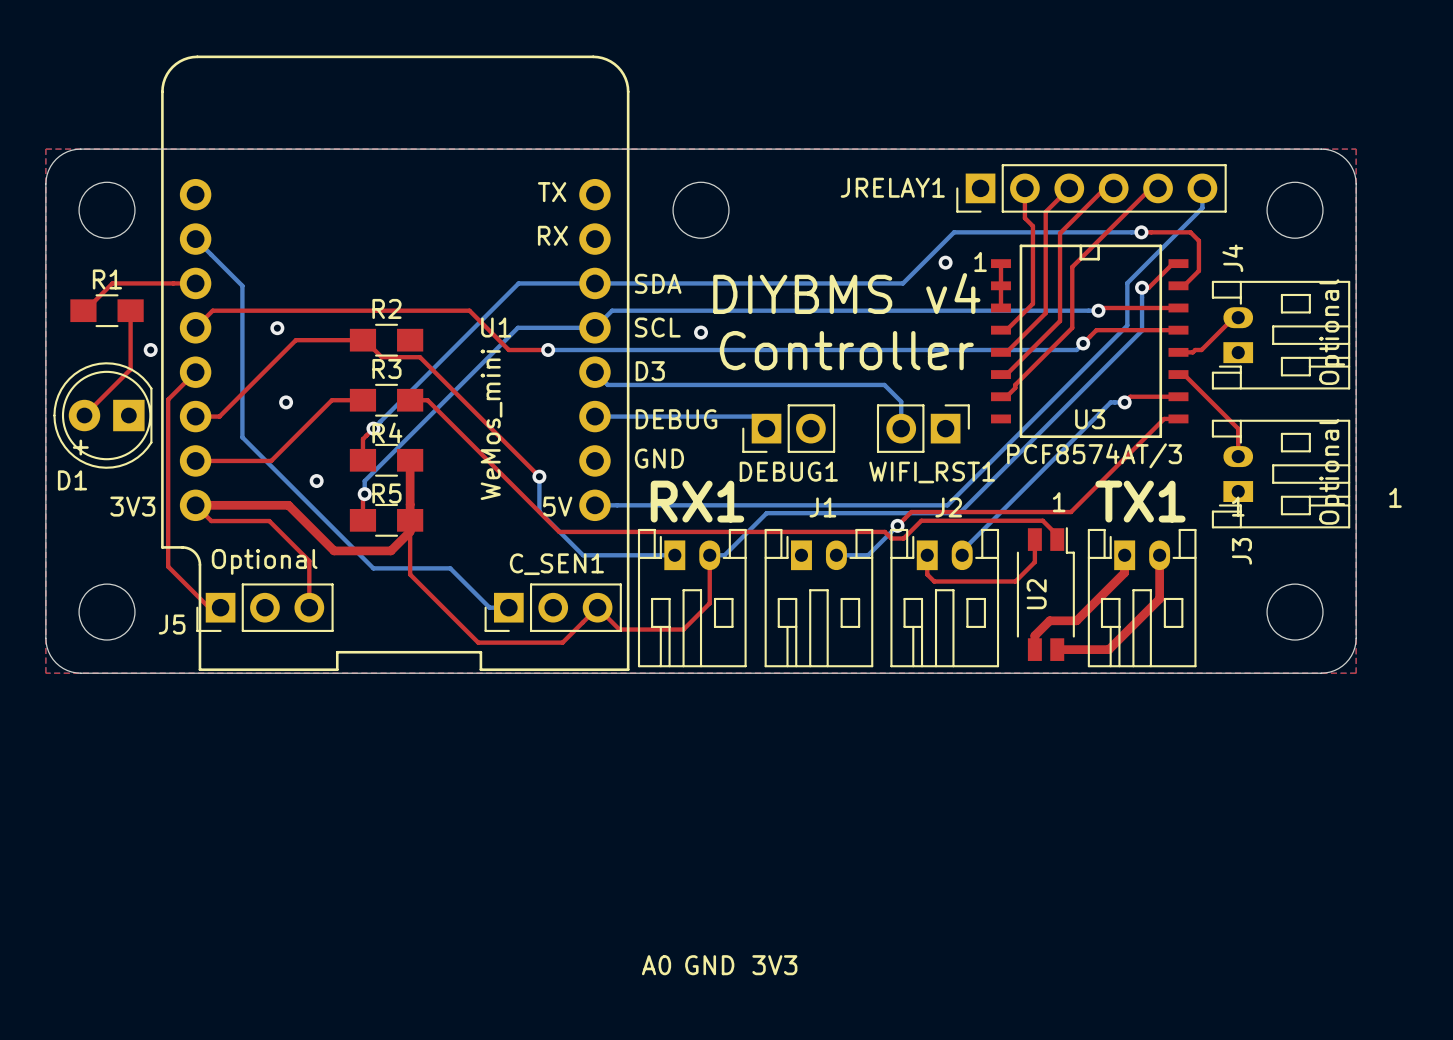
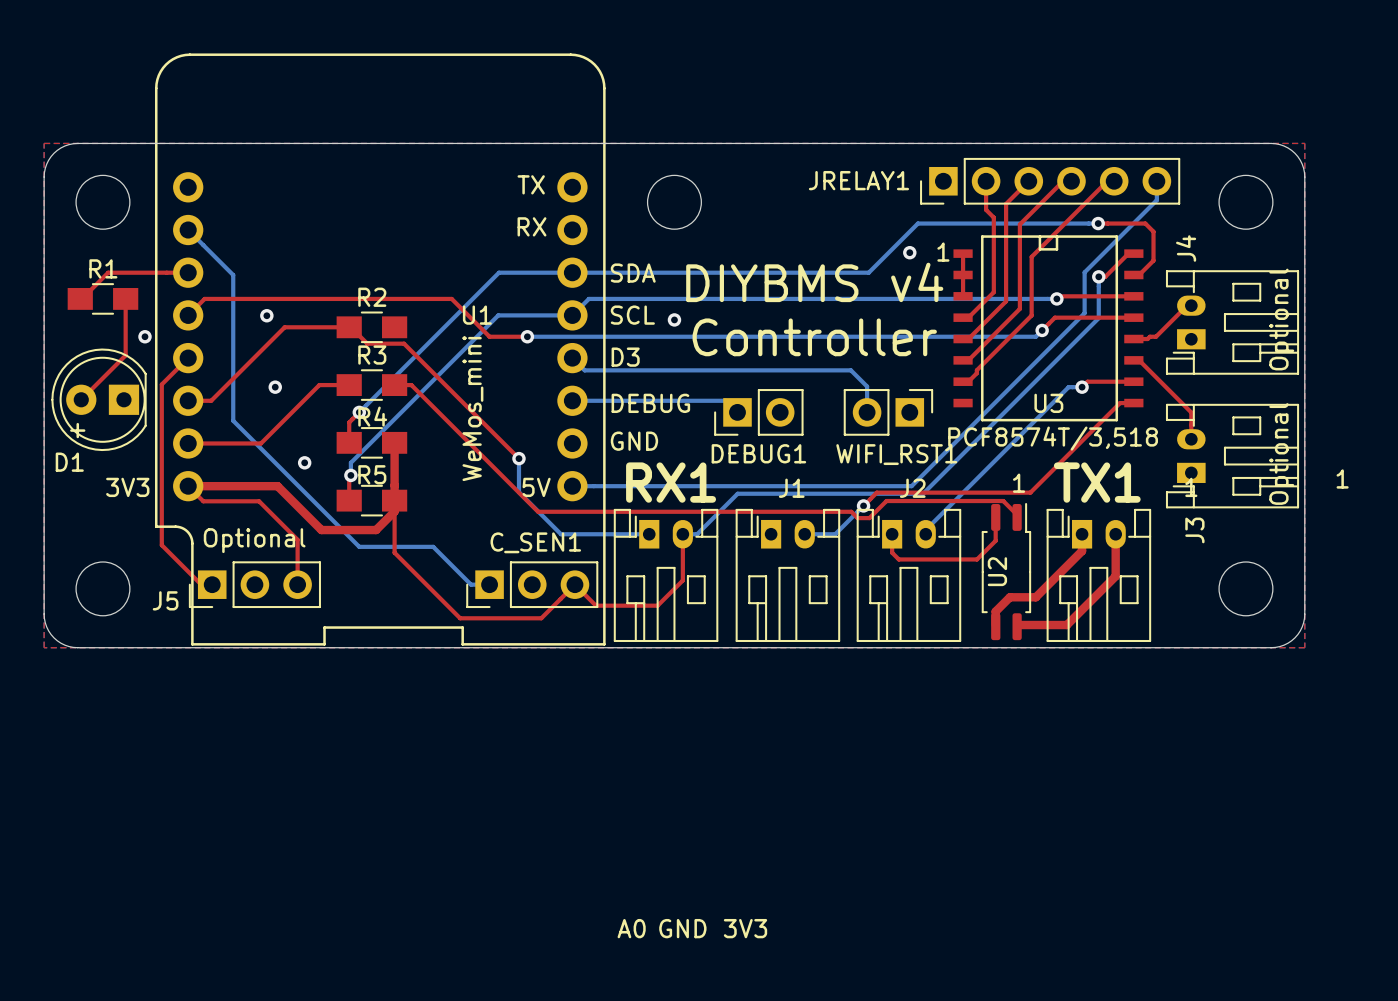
U3 value: PCF8574AT/3 (1094, 455) -> PCF8574T/3,518 (1053, 438)
U2 footprint: [1016, 527, 1075, 661] -> [981, 502, 1032, 641]

